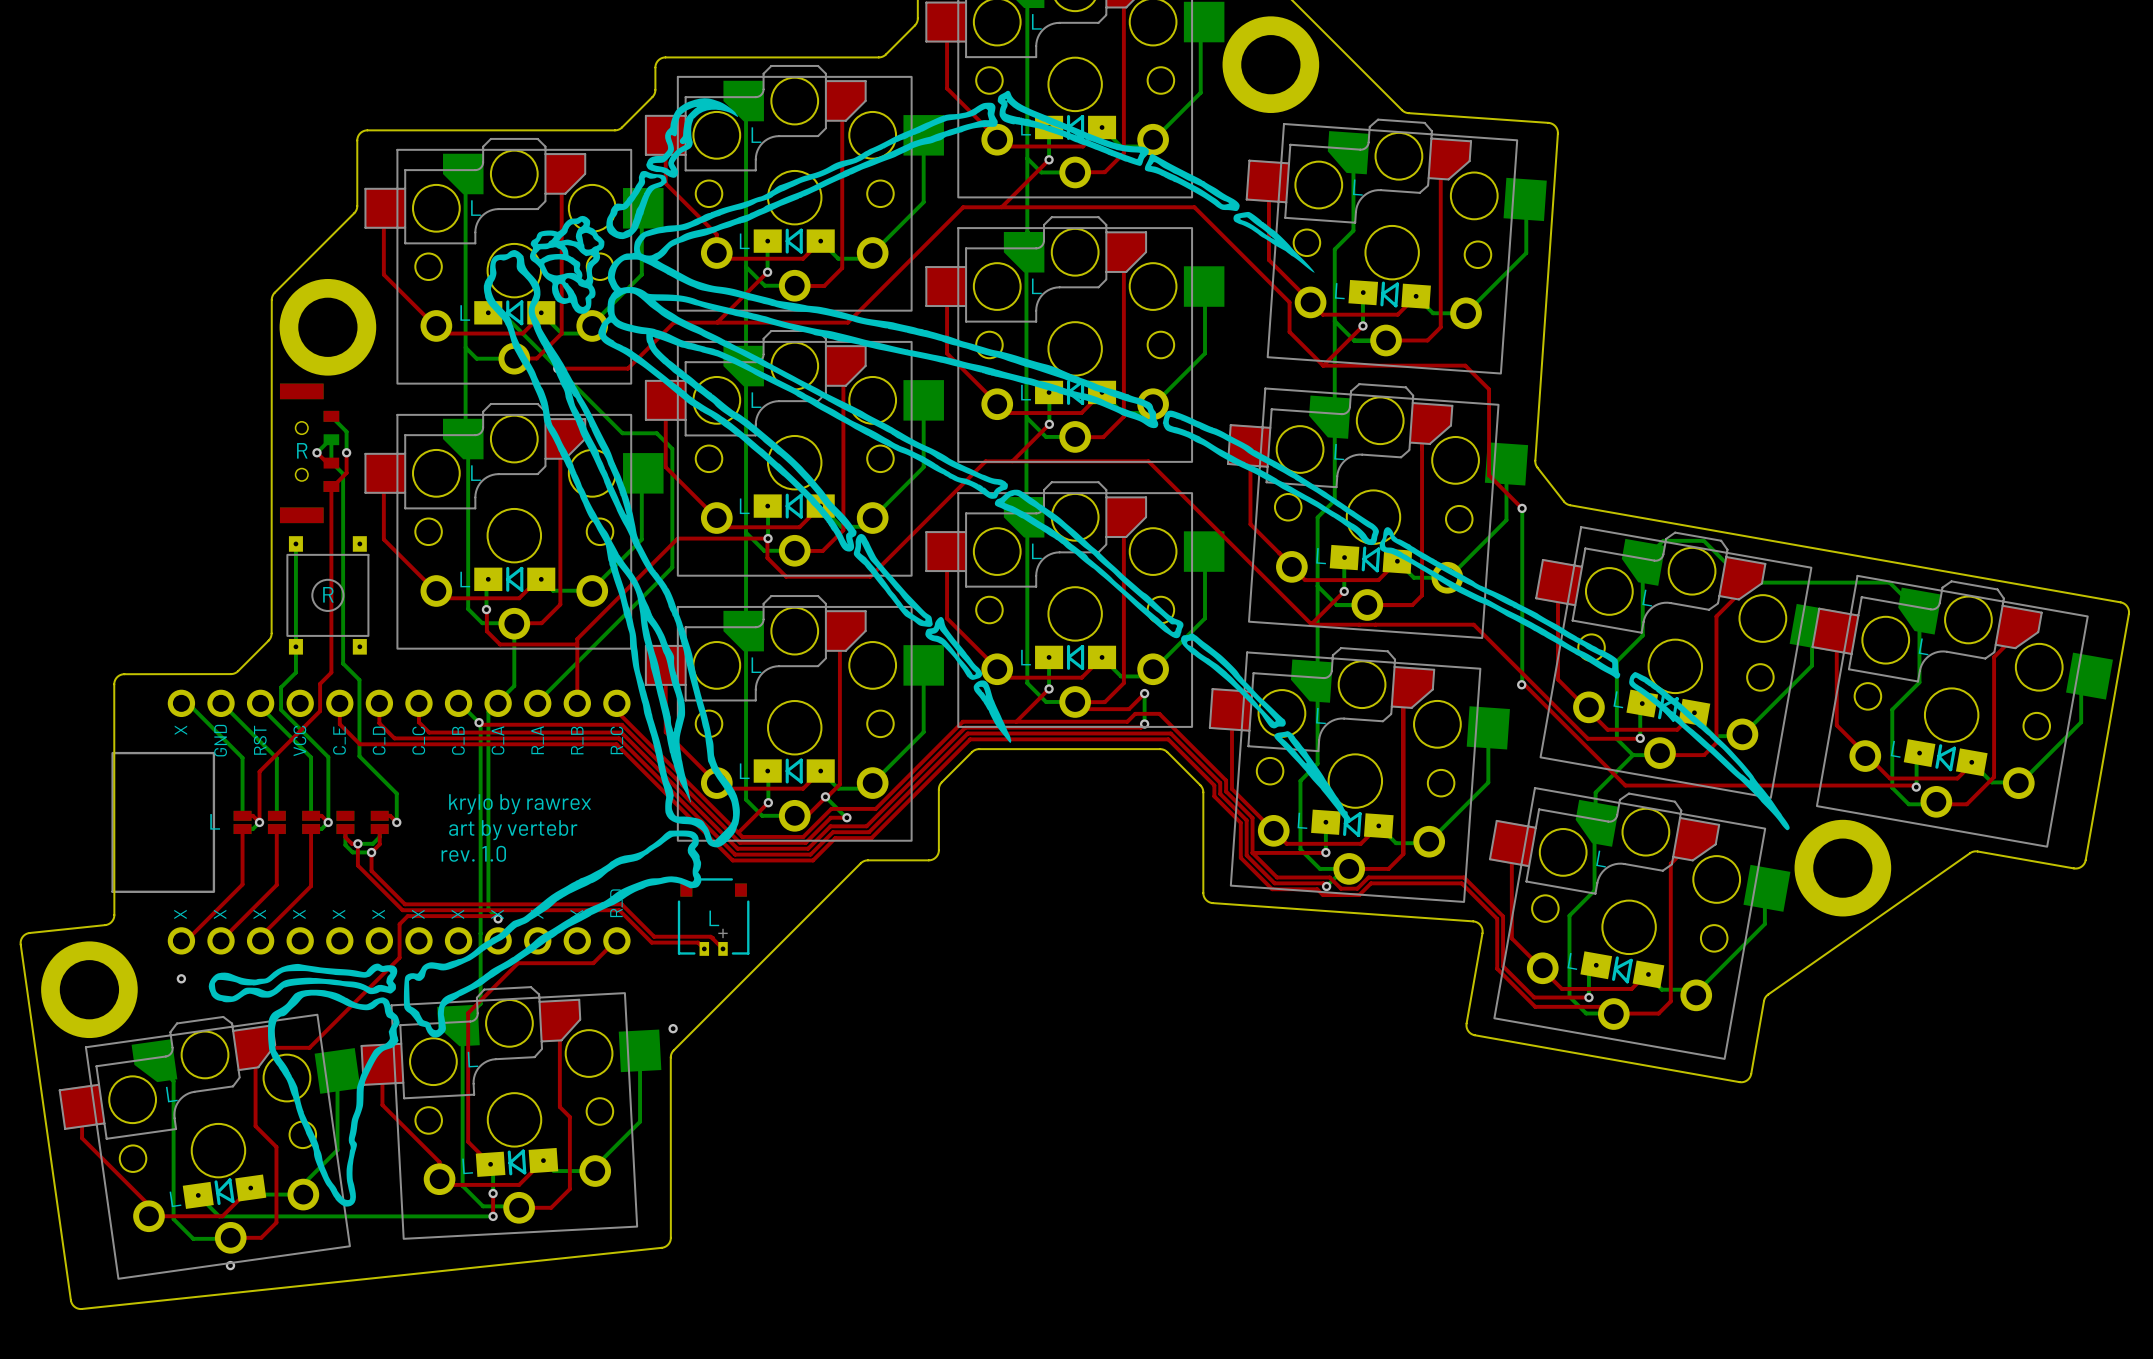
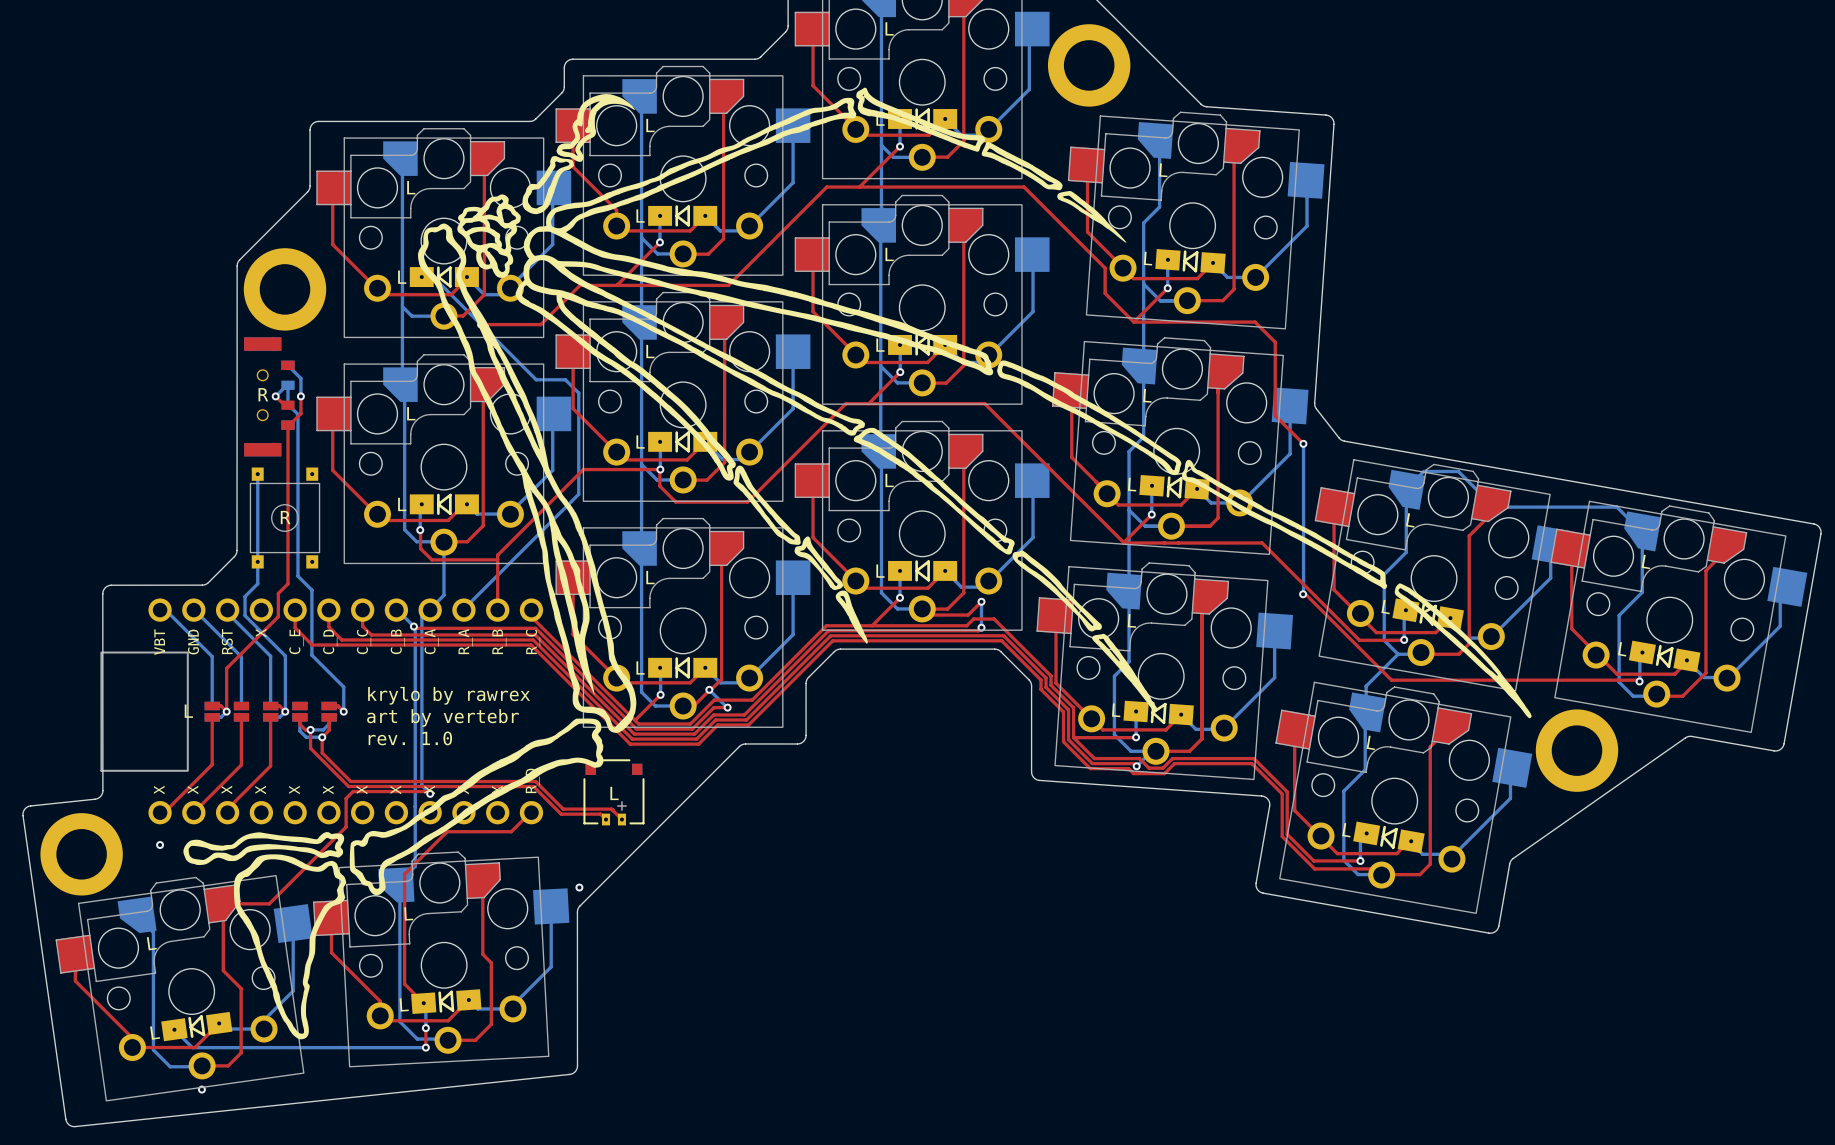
part text position: X (180, 730) -> X (261, 633)
part text: none -> VBT (159, 642)
part text: VCC (299, 740) -> none

